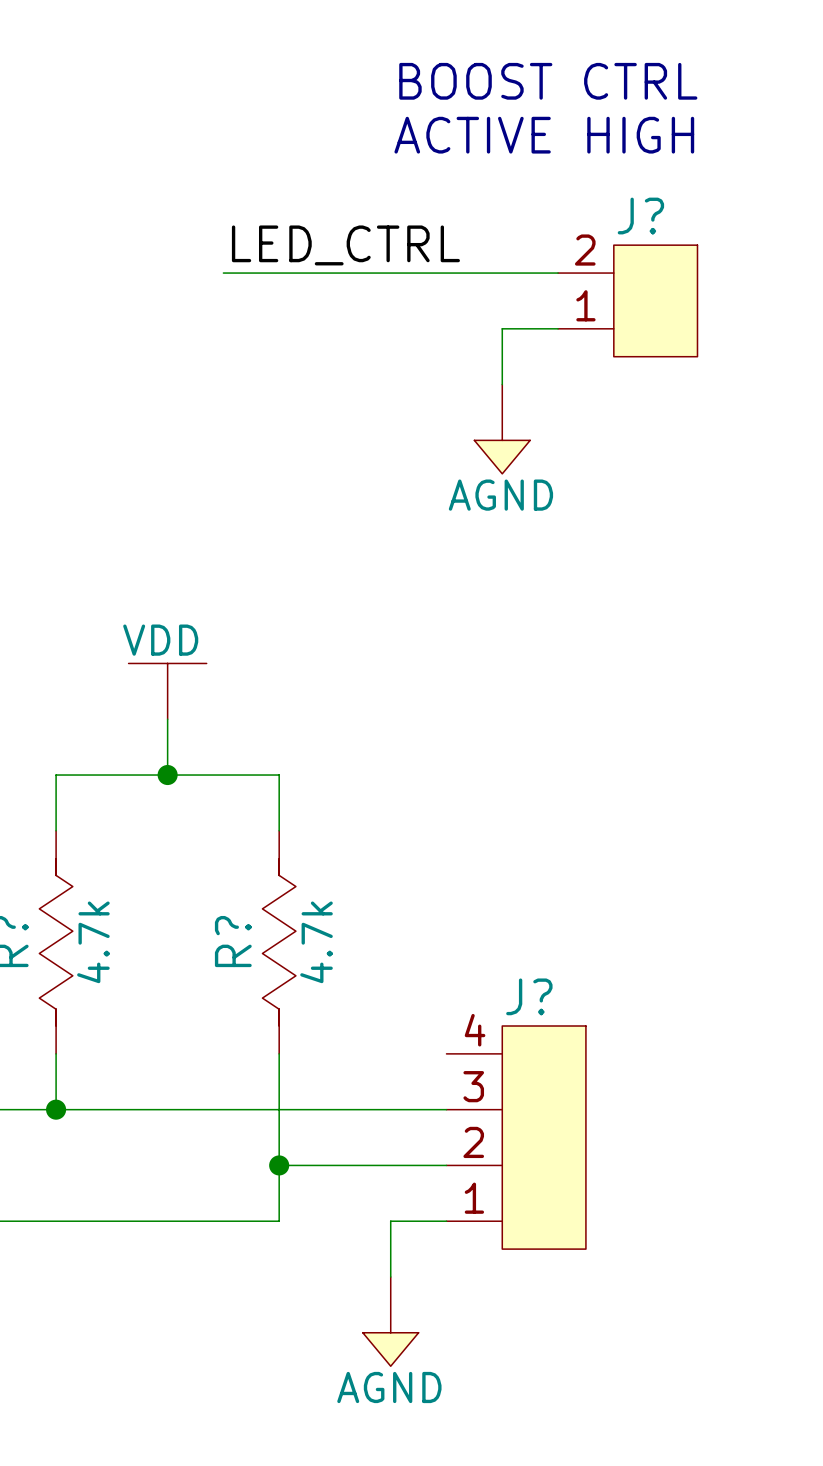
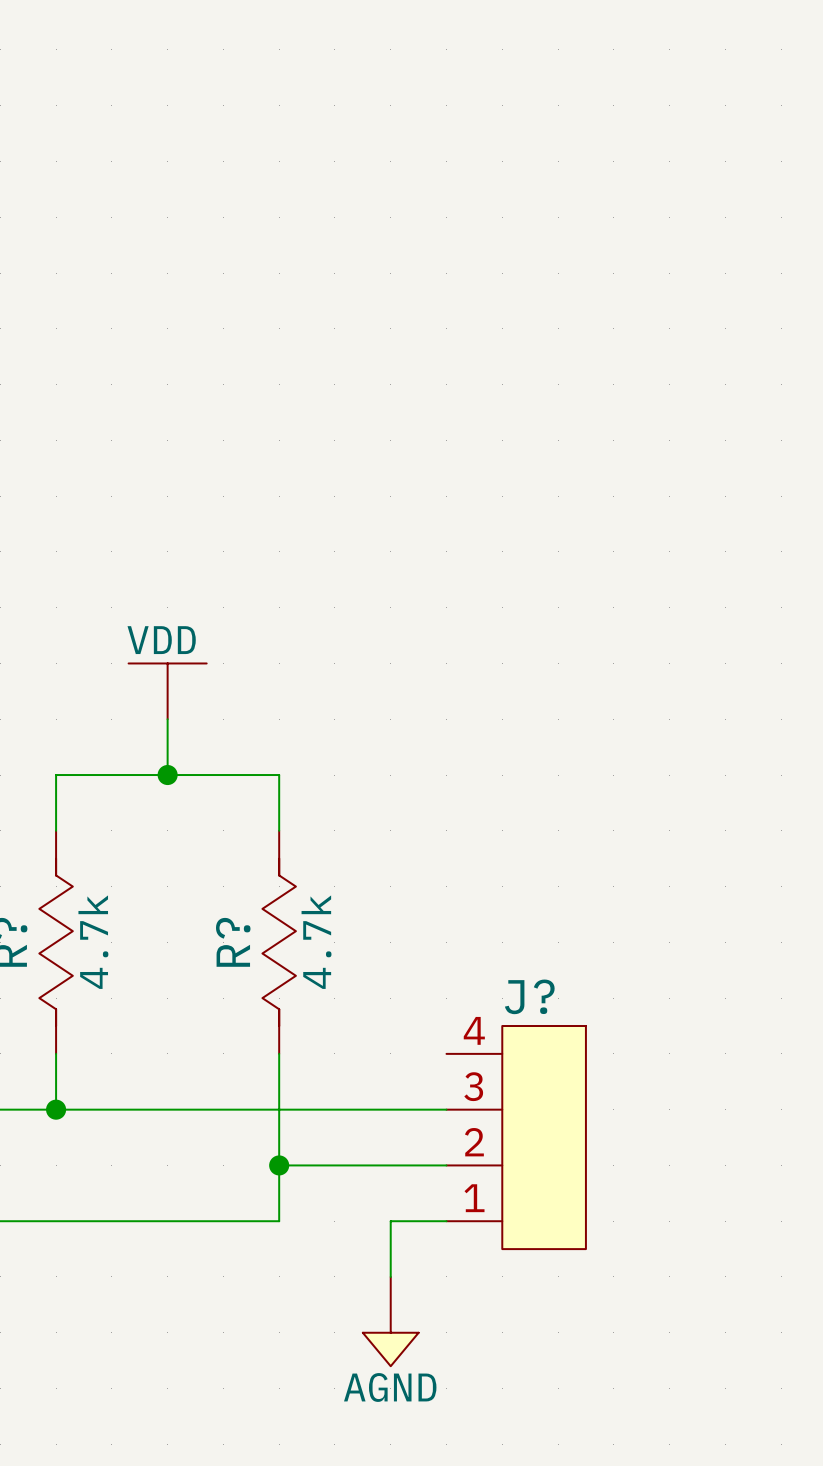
text: BOOST CTRL (548, 81) -> none
text: ACTIVE HIGH (544, 135) -> none
label: LED_CTRL (345, 245) -> none
wire: (223, 273) (558, 273) -> none
J?: (627, 300) -> none
wire: (558, 328) (502, 328) (502, 384) -> none
power symbol: AGND (502, 429) -> none

